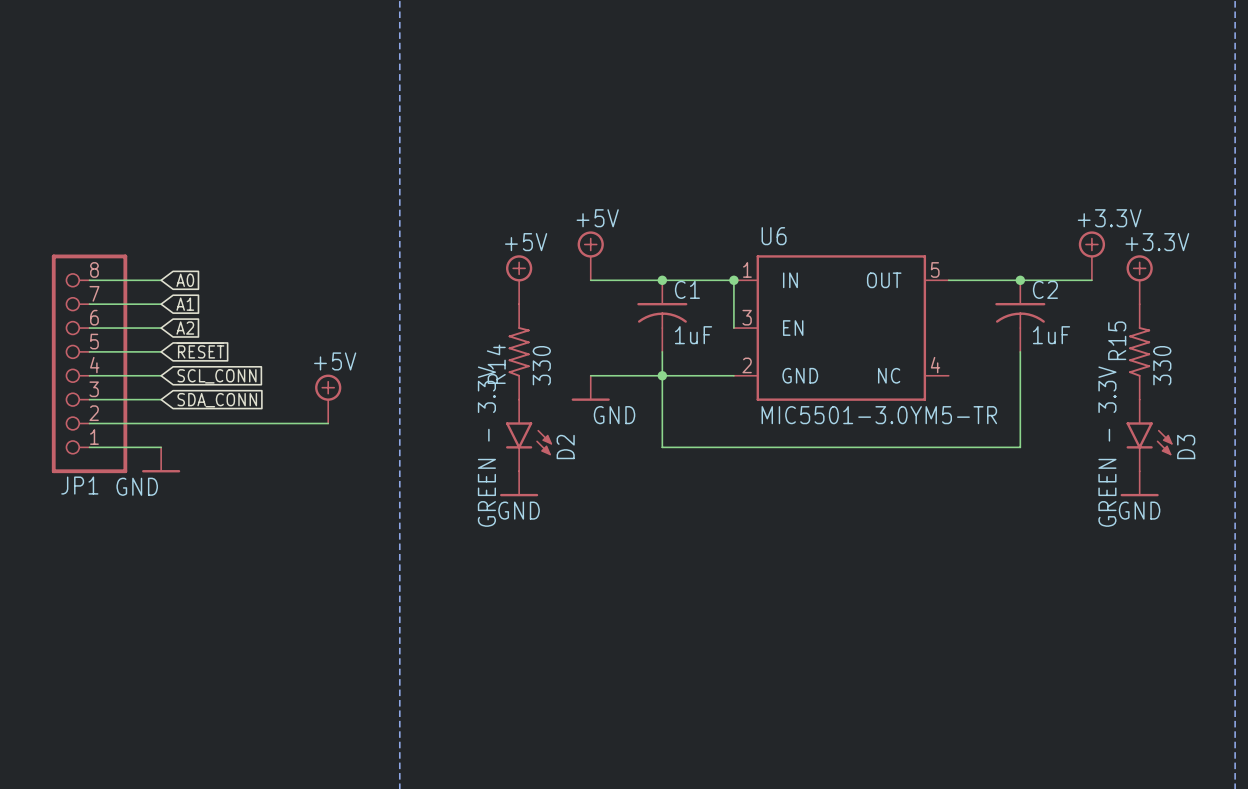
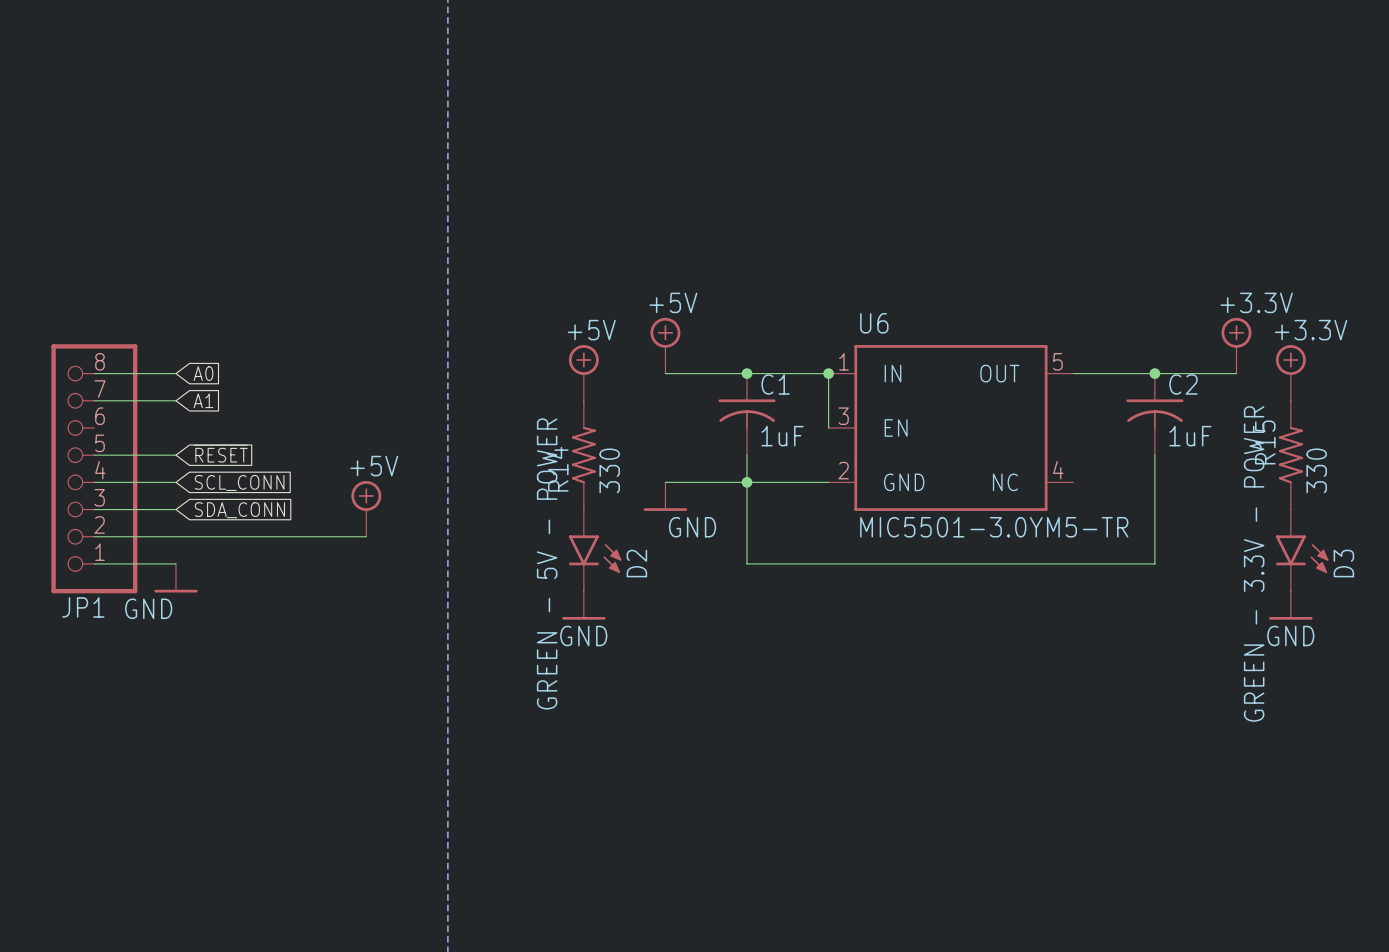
wire: (89, 328) (161, 328) -> none
global label: A2 (185, 328) -> none
D2 value: GREEN - 3.3V (486, 446) -> GREEN - 5V - POWER (547, 563)
D3 value: GREEN - 3.3V (1107, 446) -> GREEN - 3.3V - POWER (1254, 563)

